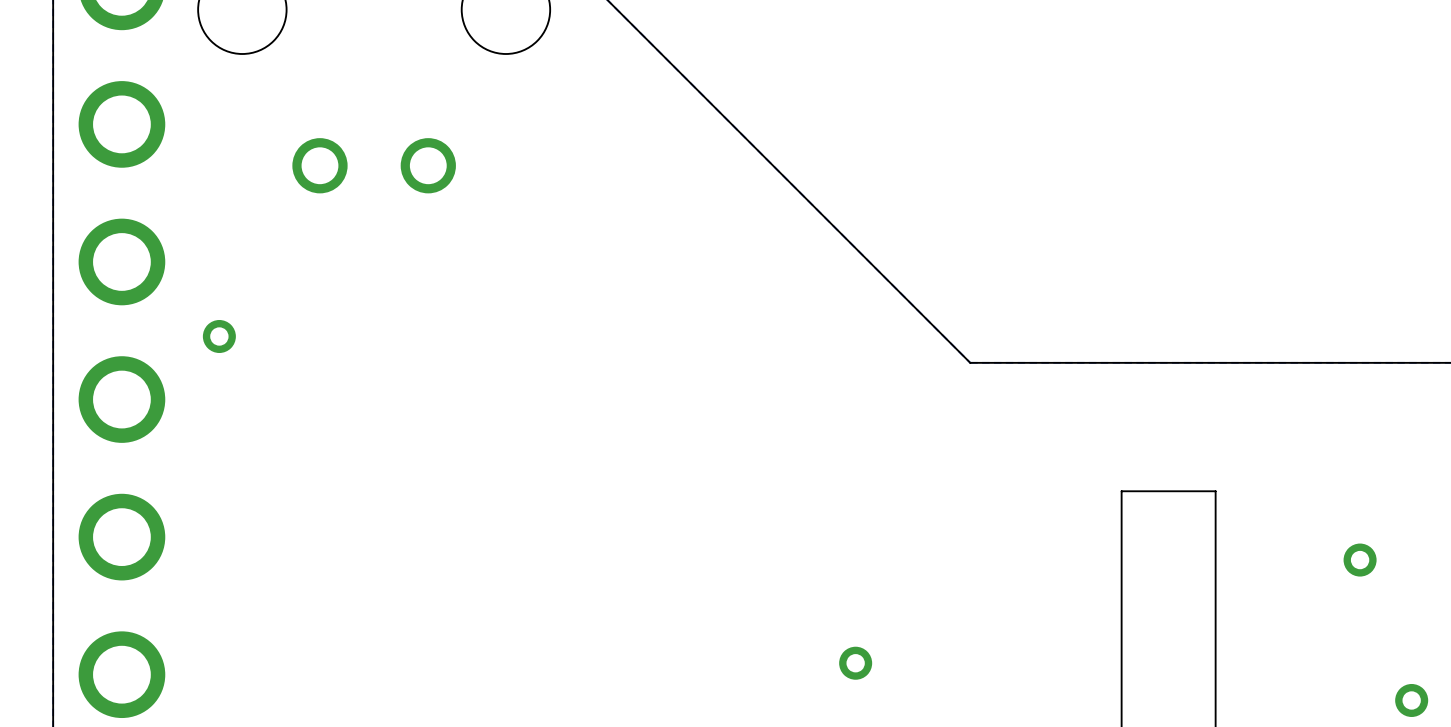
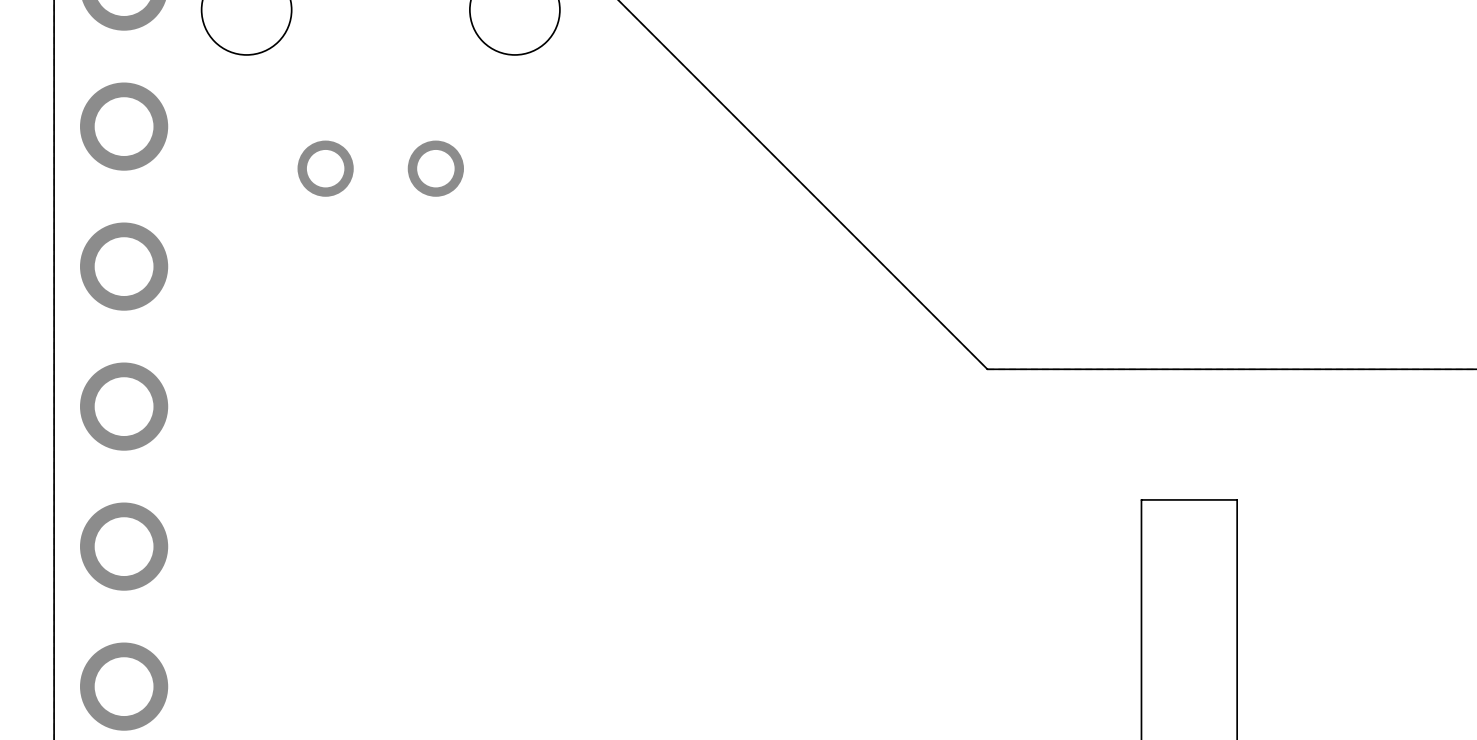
via: (219, 336) -> none
via: (1360, 560) -> none
via: (855, 663) -> none
via: (1411, 700) -> none

